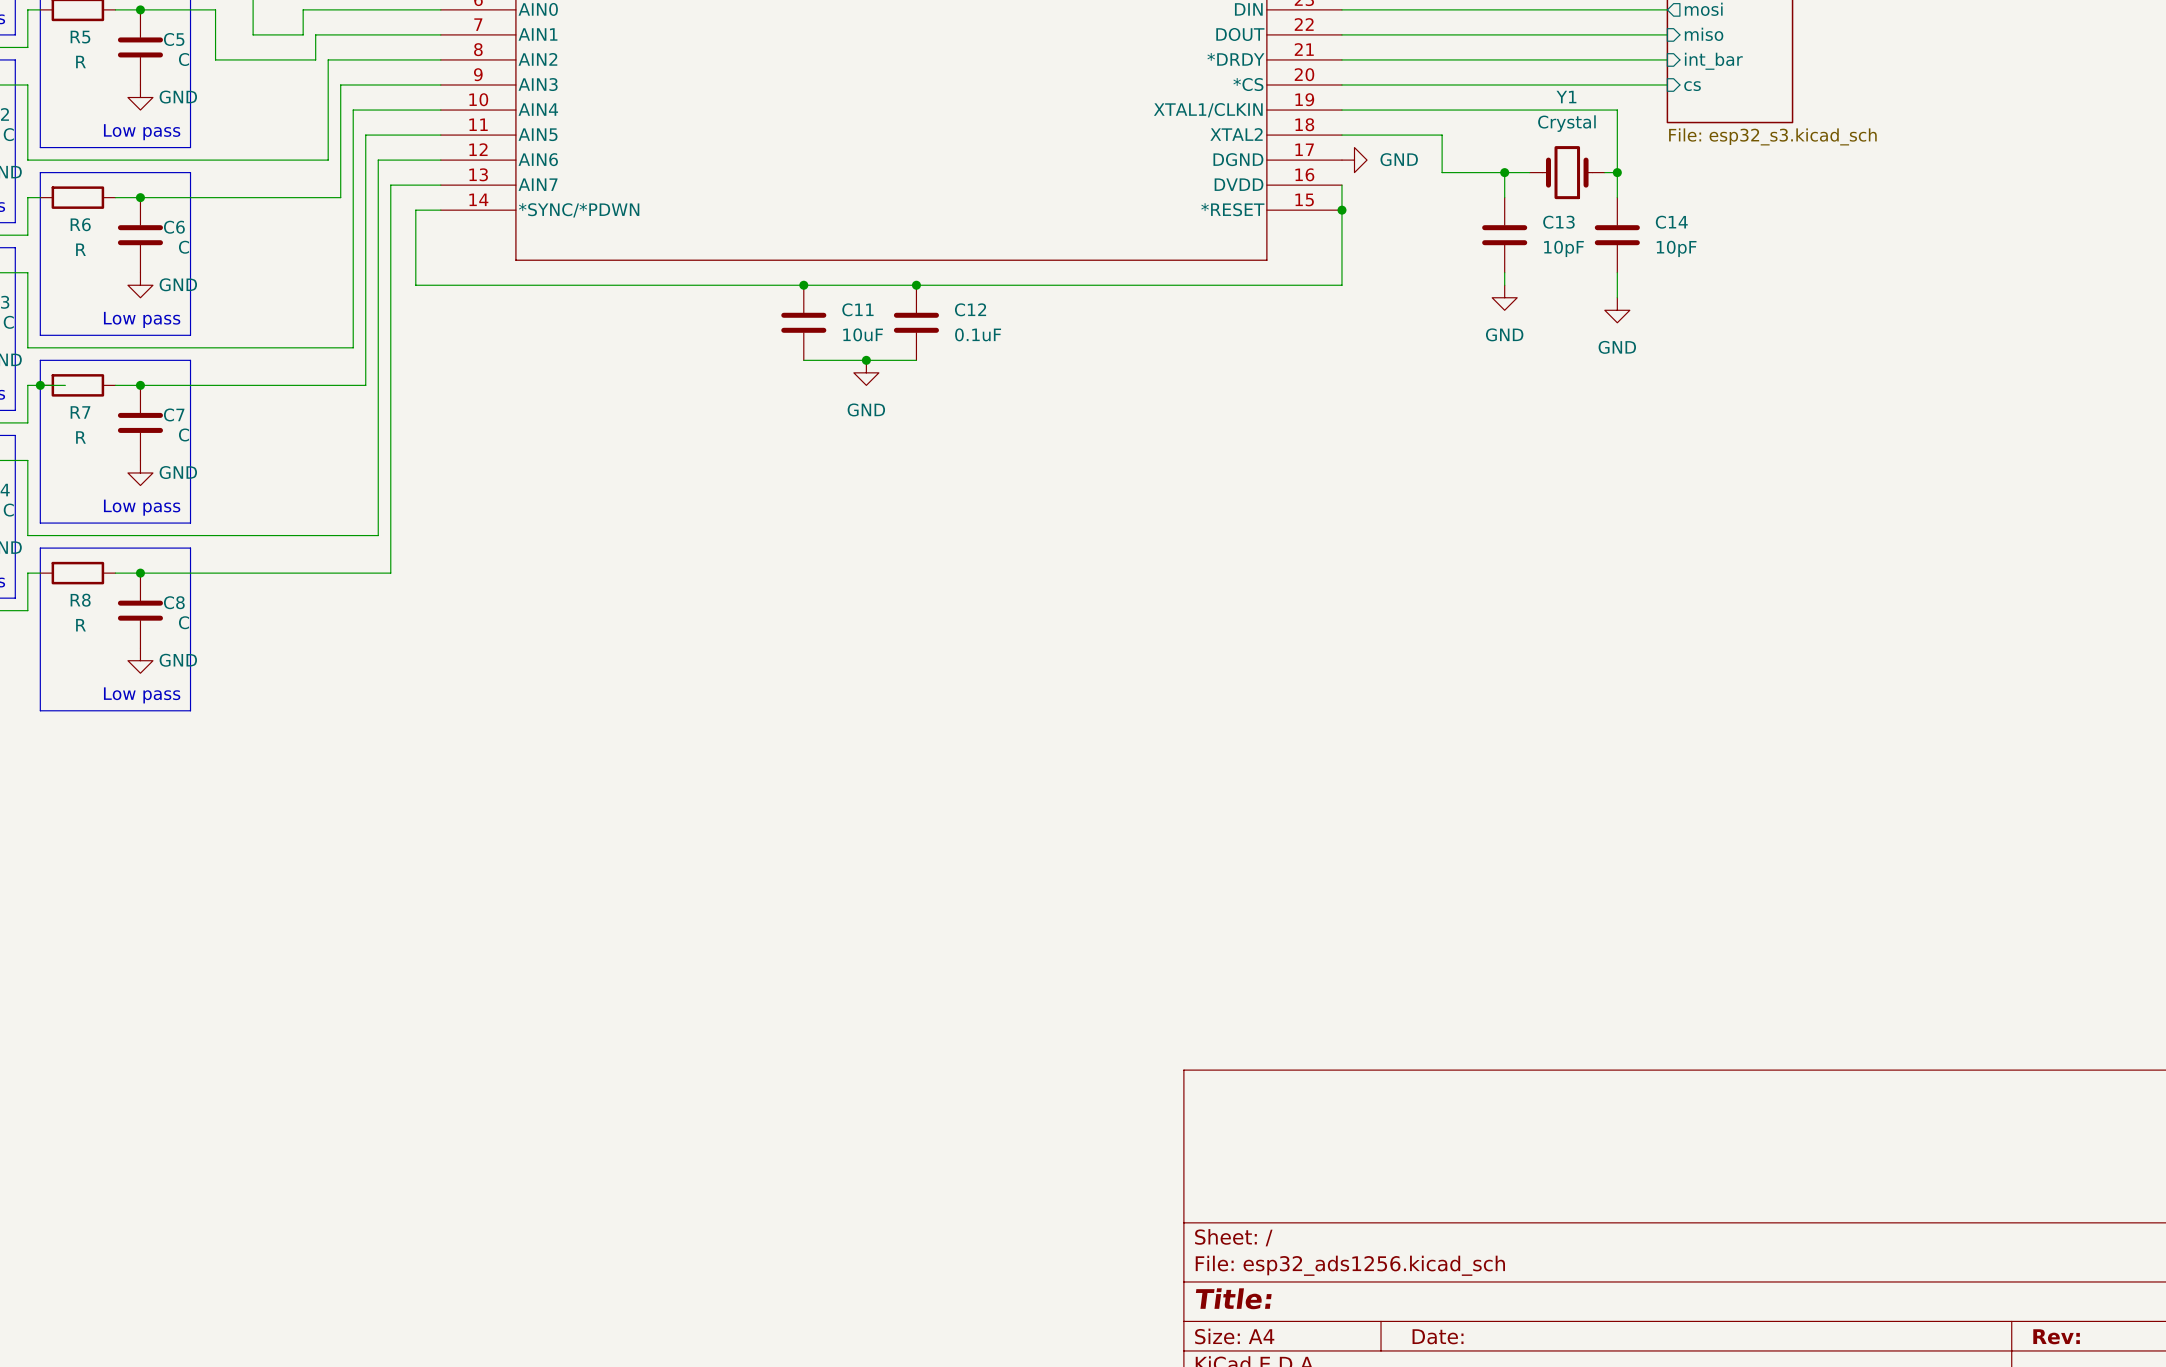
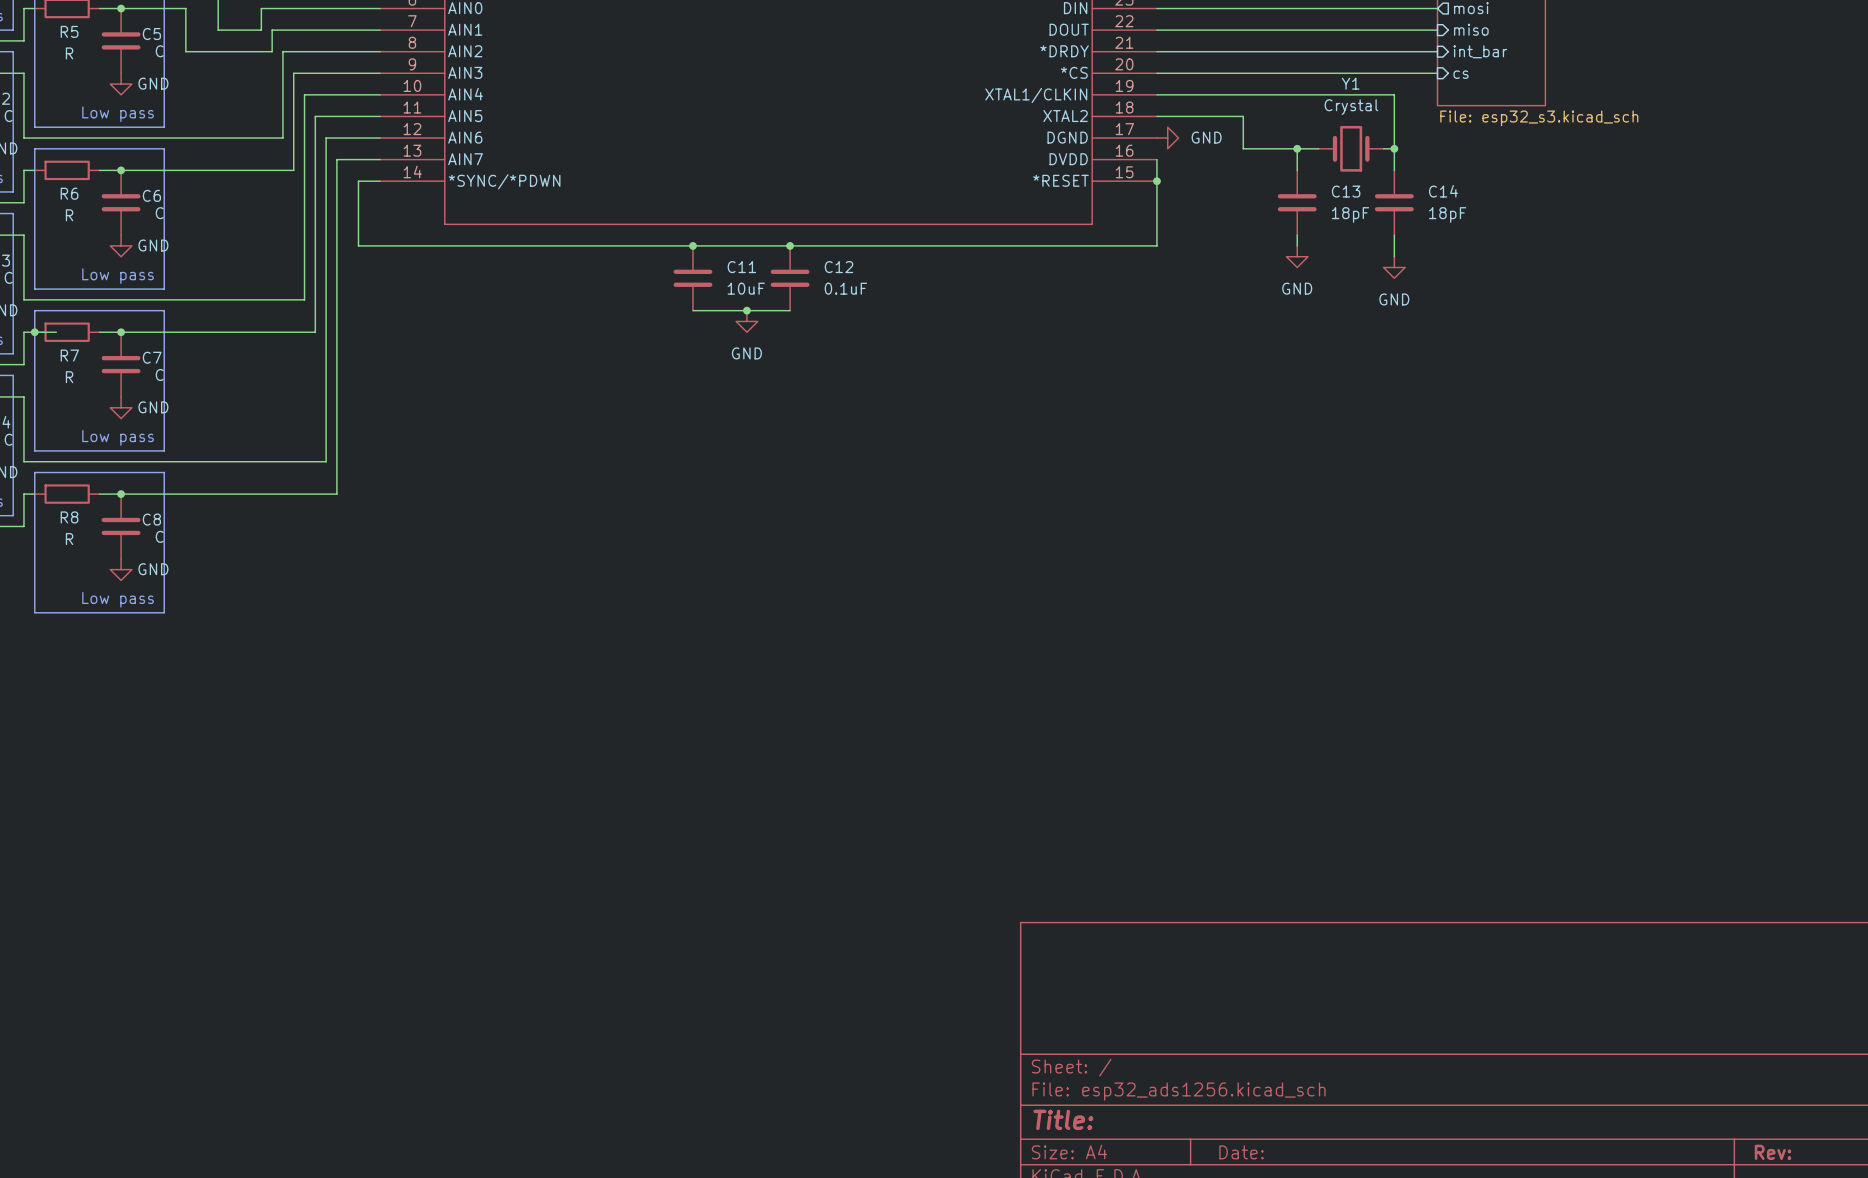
C13 value: 10pF (1563, 248) -> 18pF (1350, 214)
C14 value: 10pF (1676, 248) -> 18pF (1447, 214)

